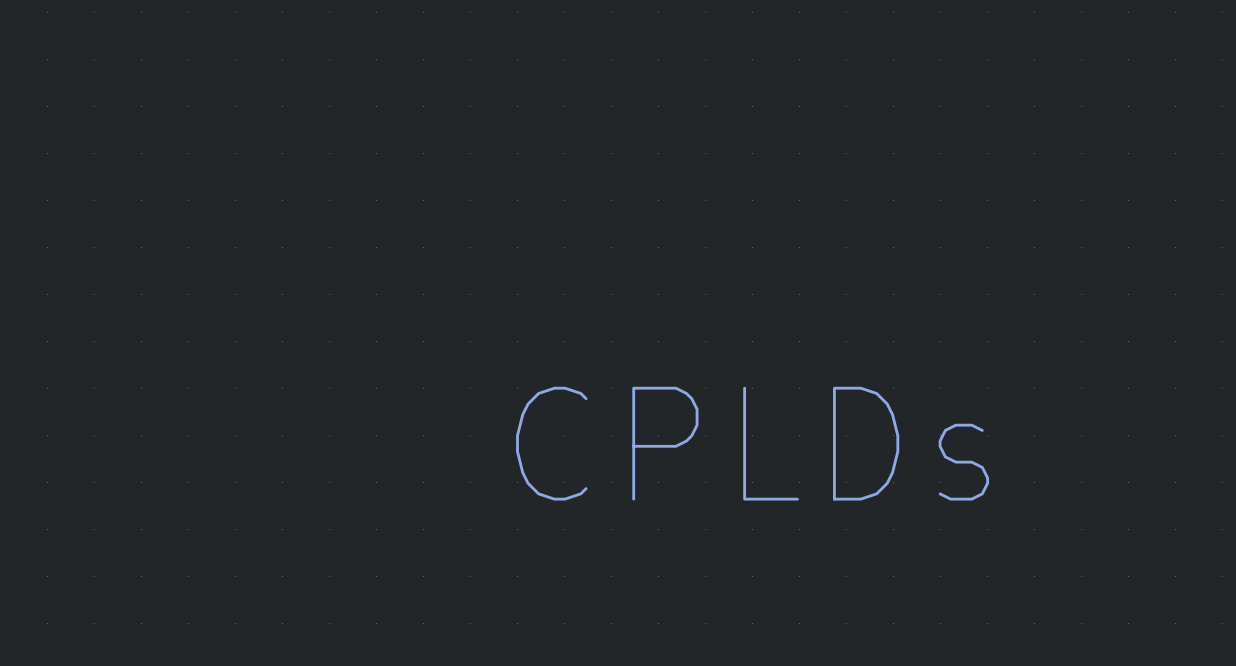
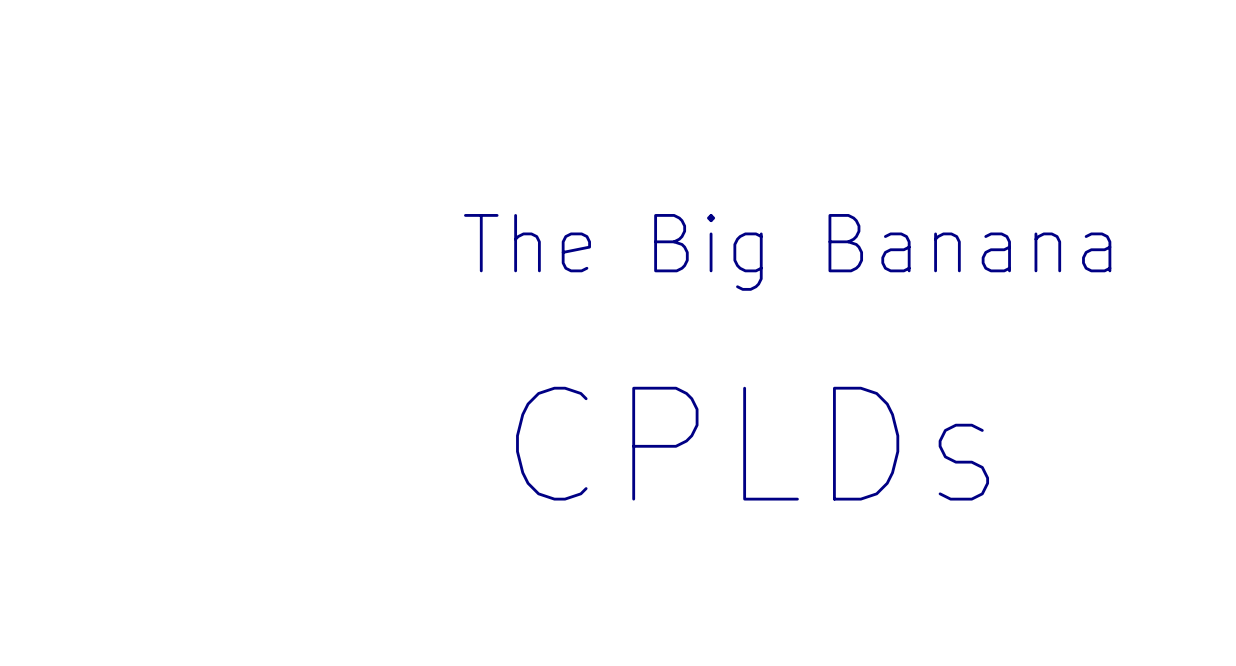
text: none -> The Big Banana (787, 252)

